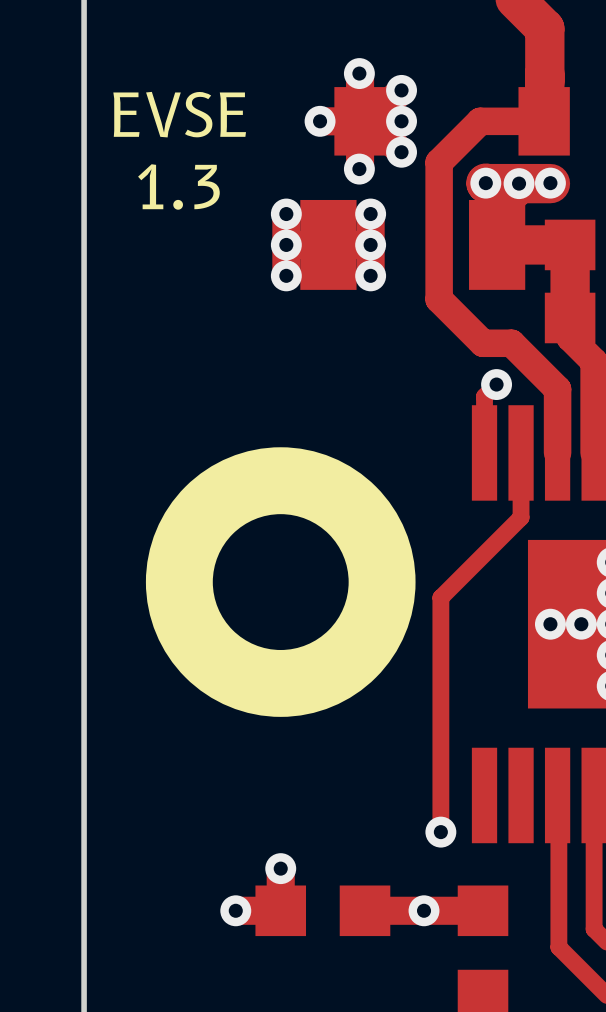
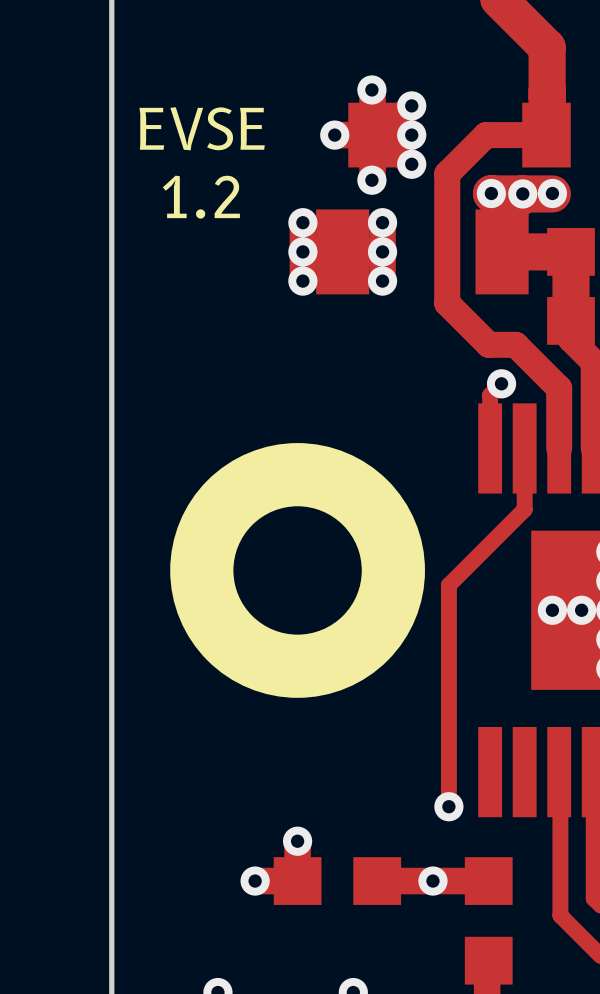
text: 1.3 (178, 186) -> 1.2 (201, 197)

